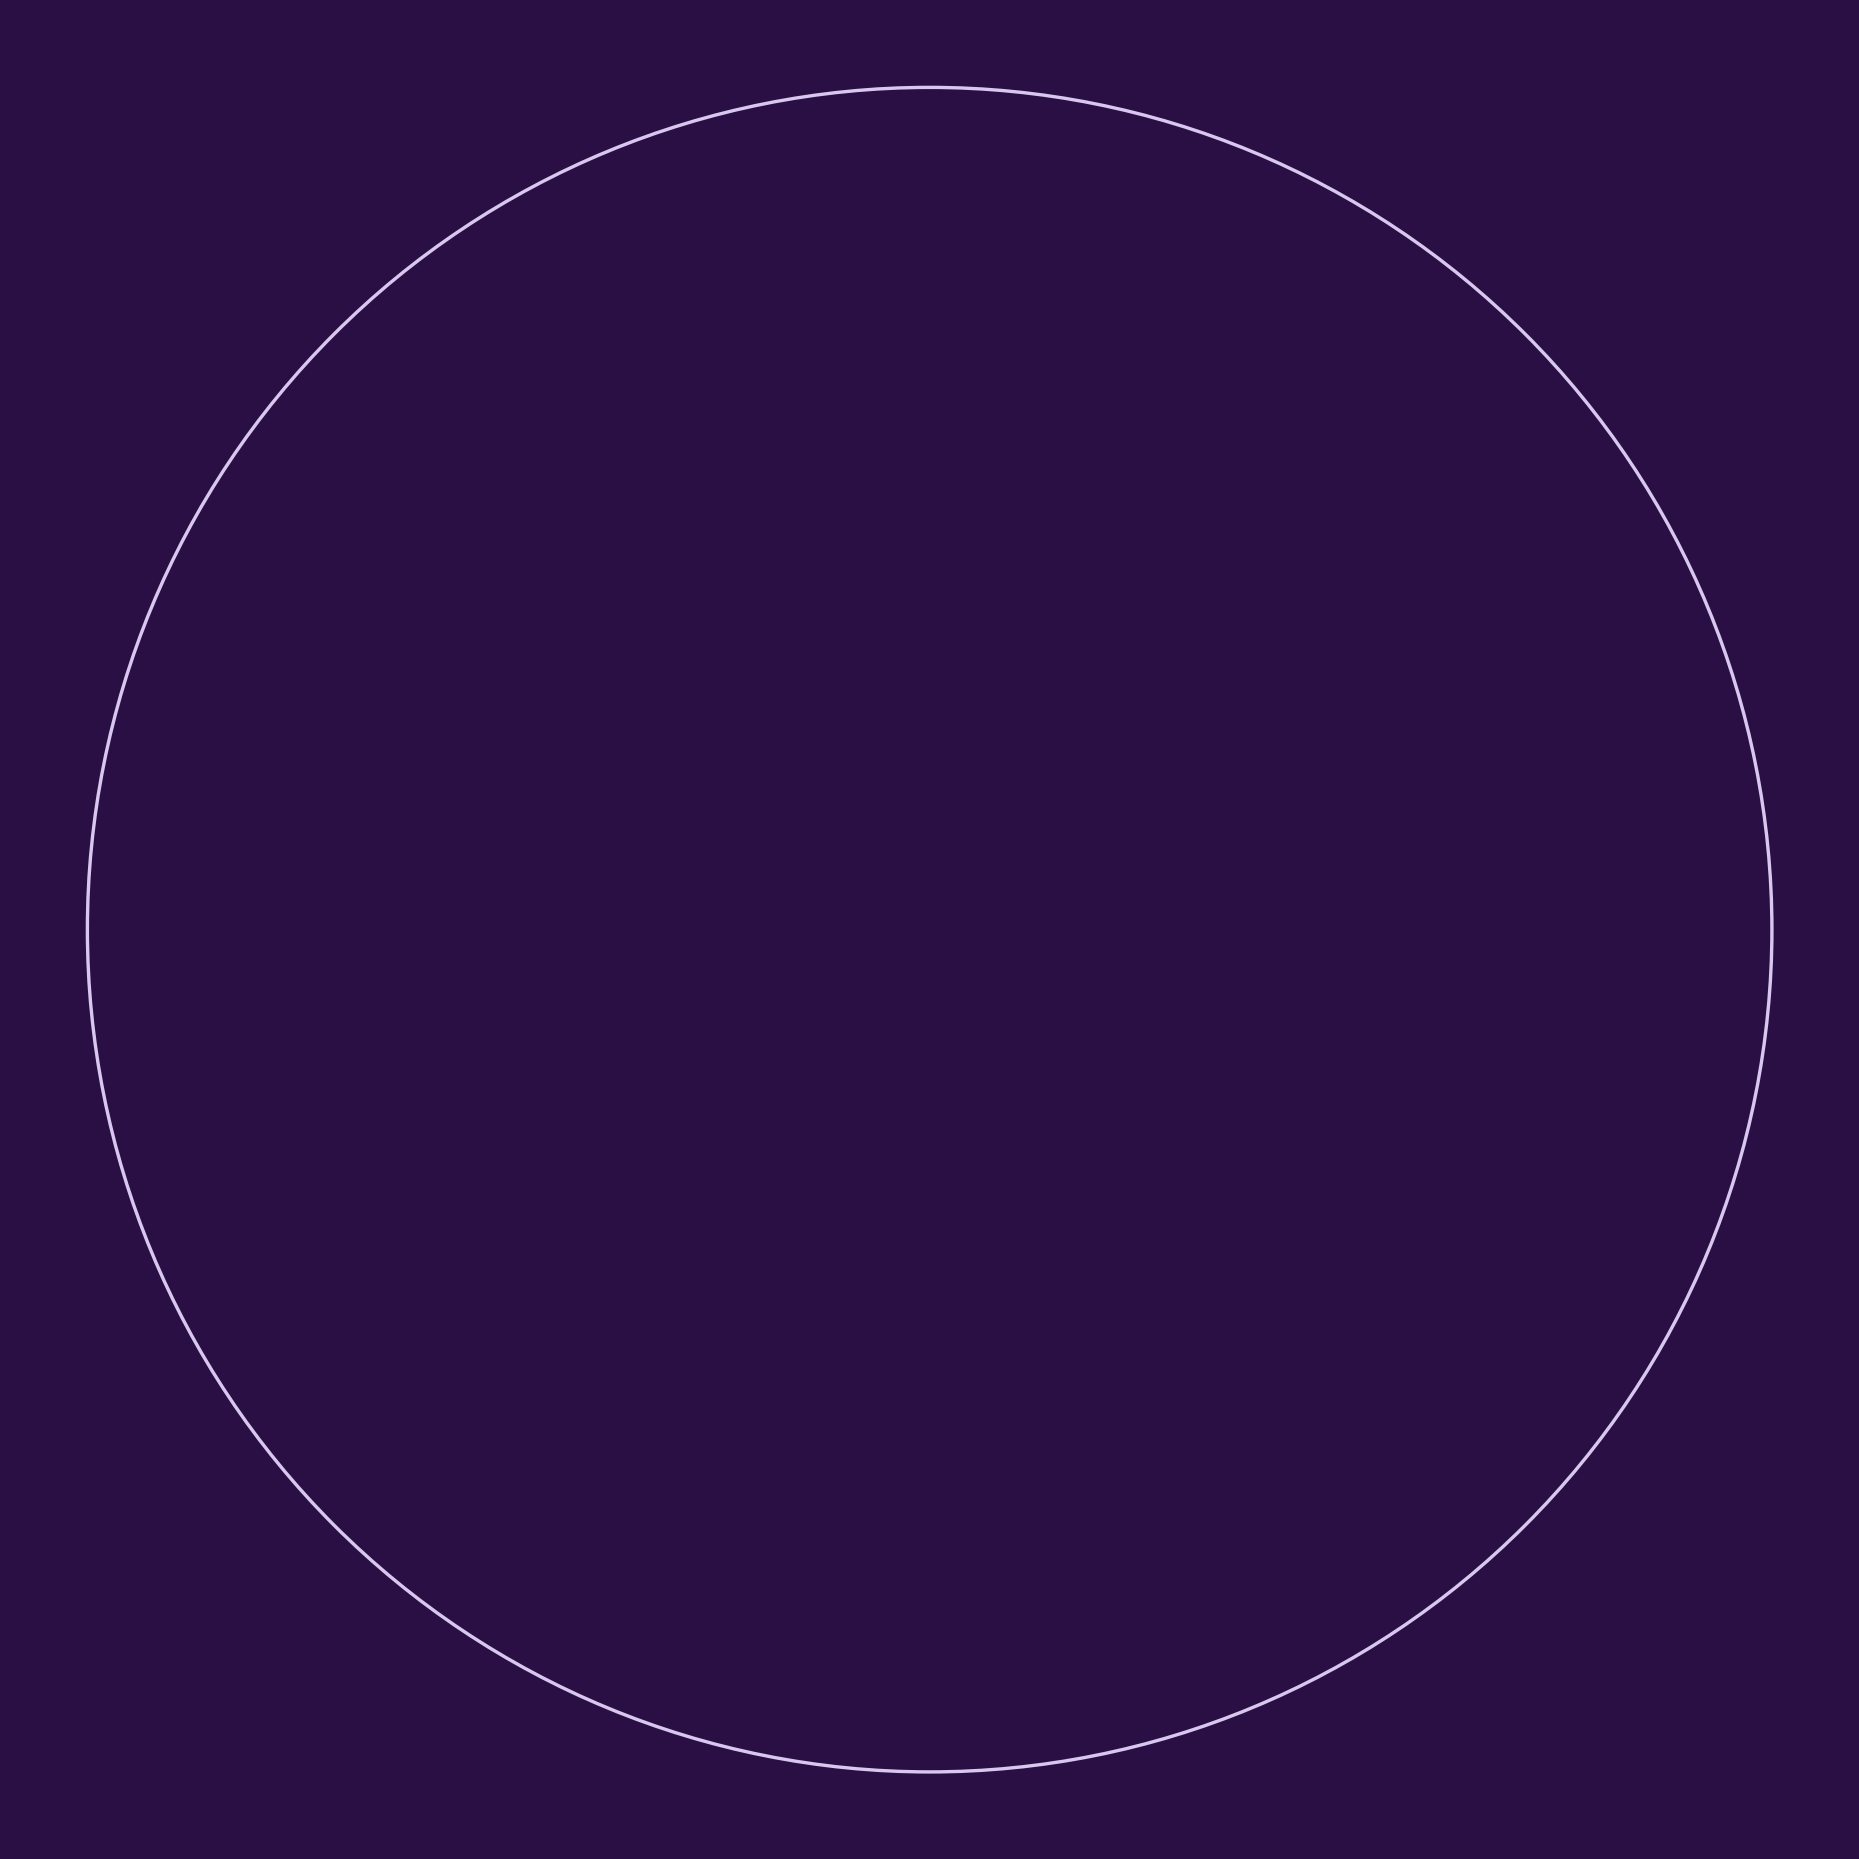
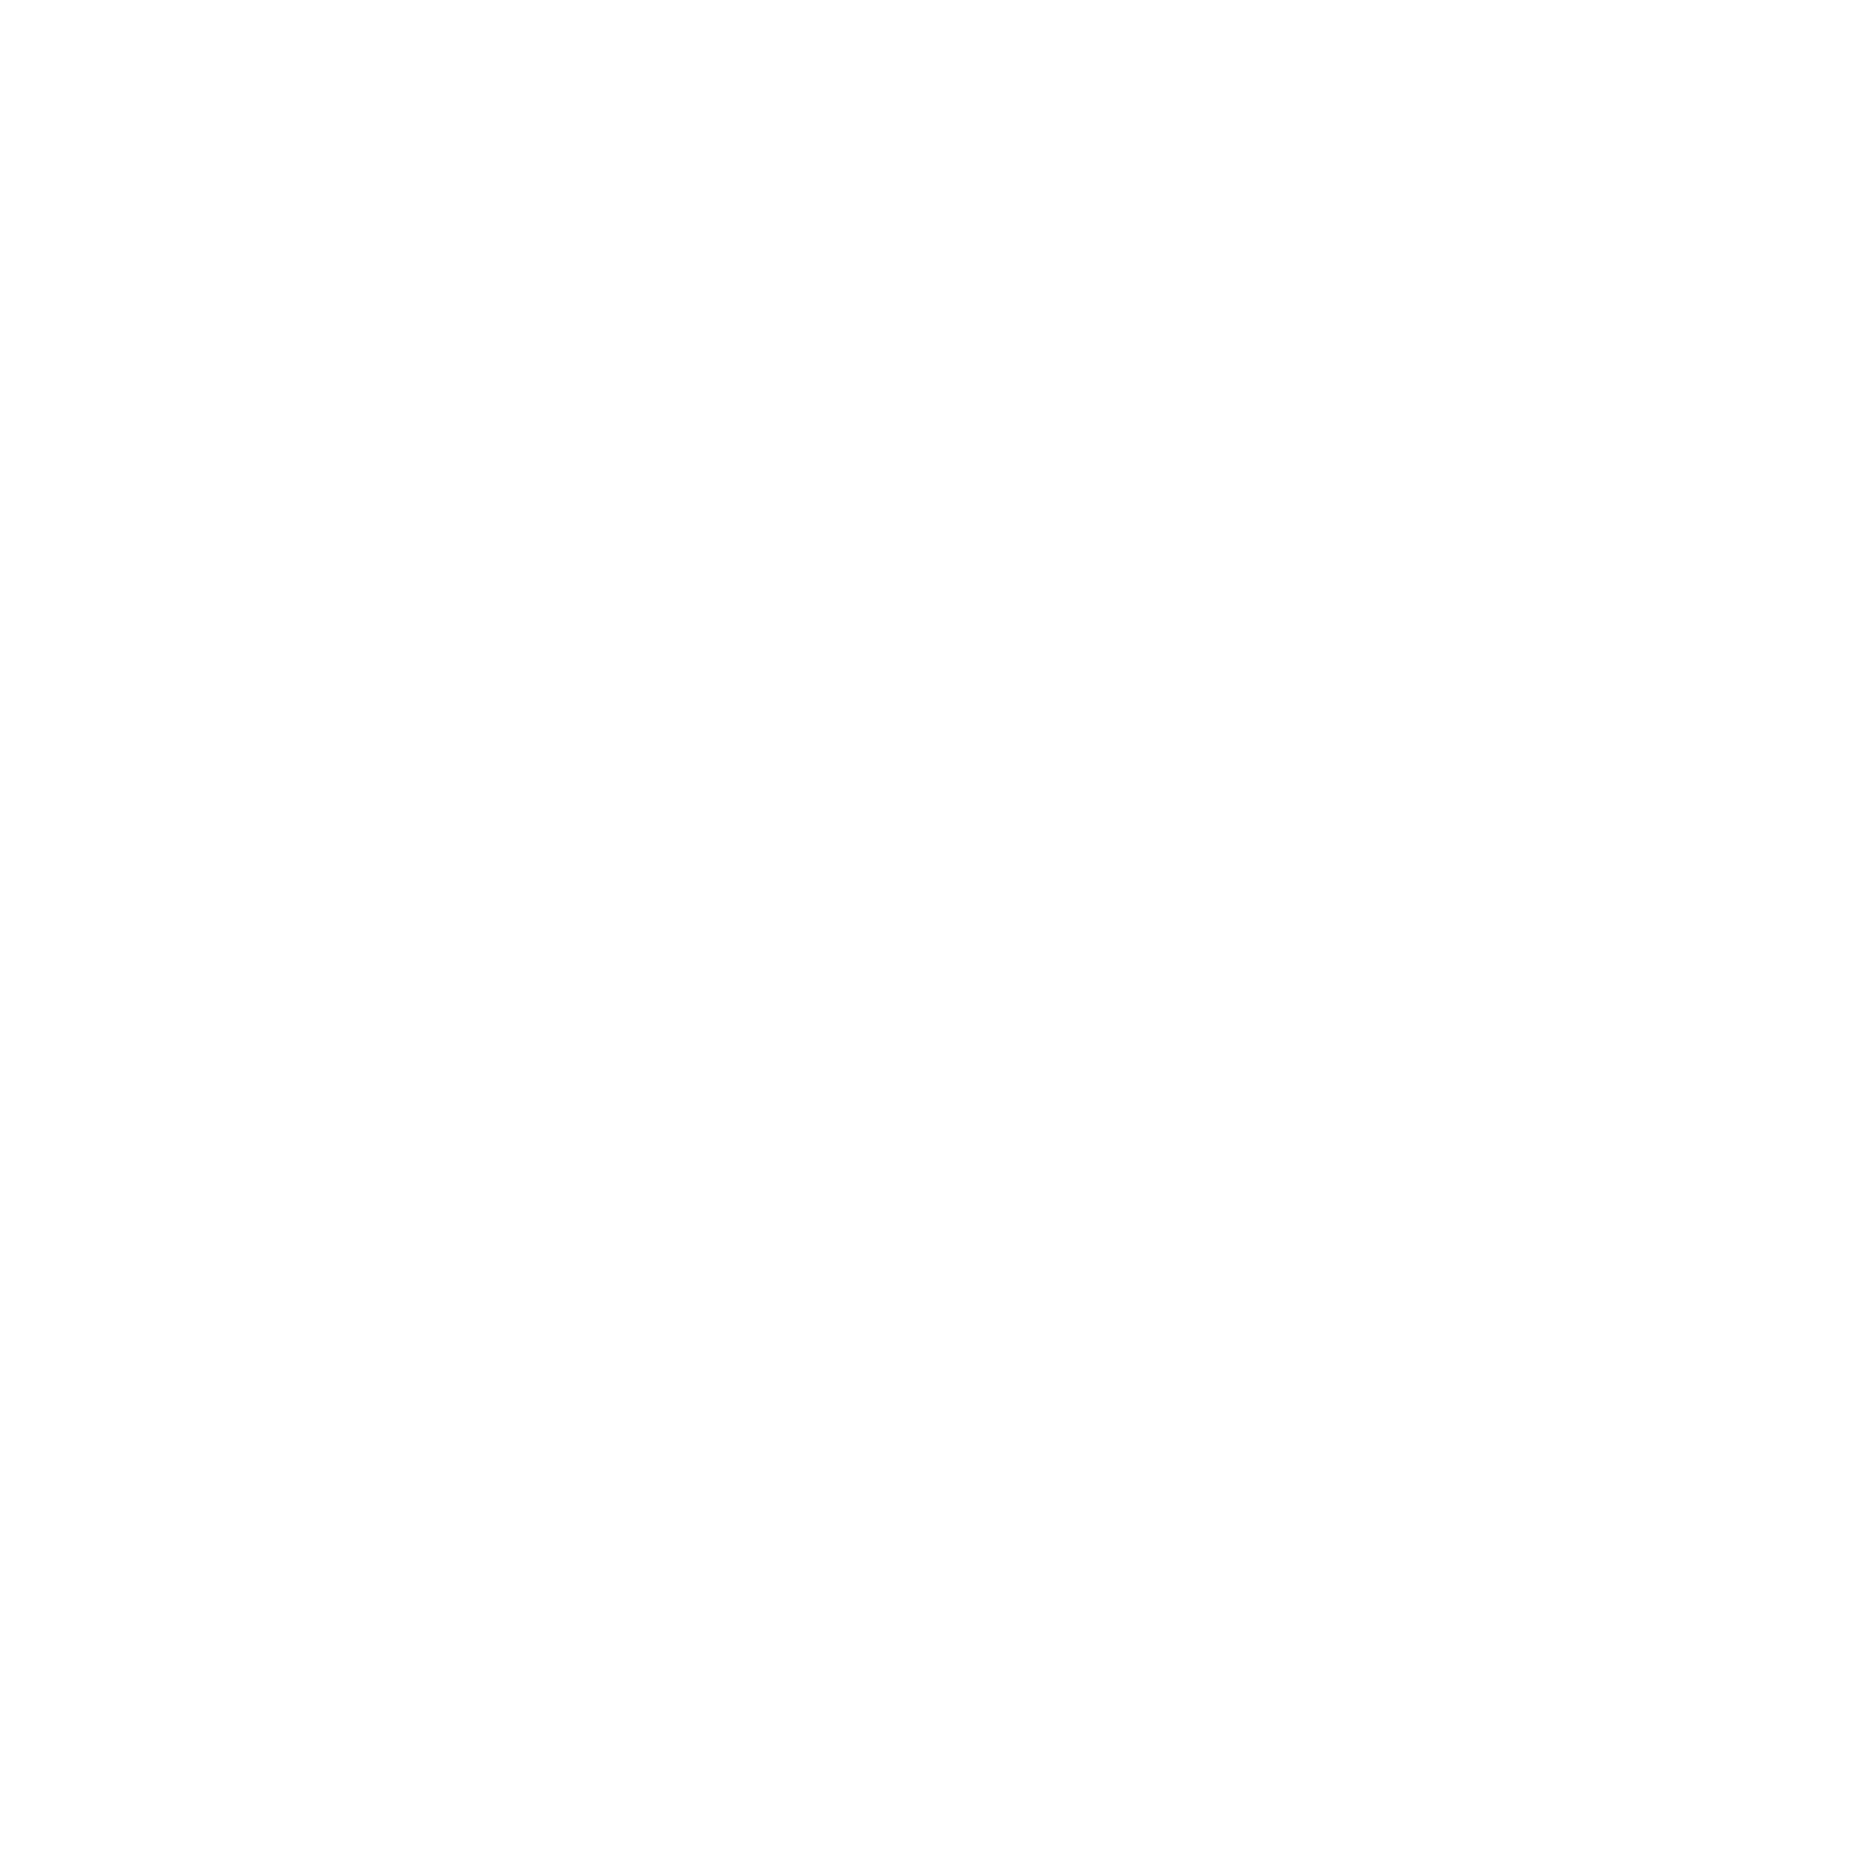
round board edge: [85, 85, 1774, 1774] -> none

